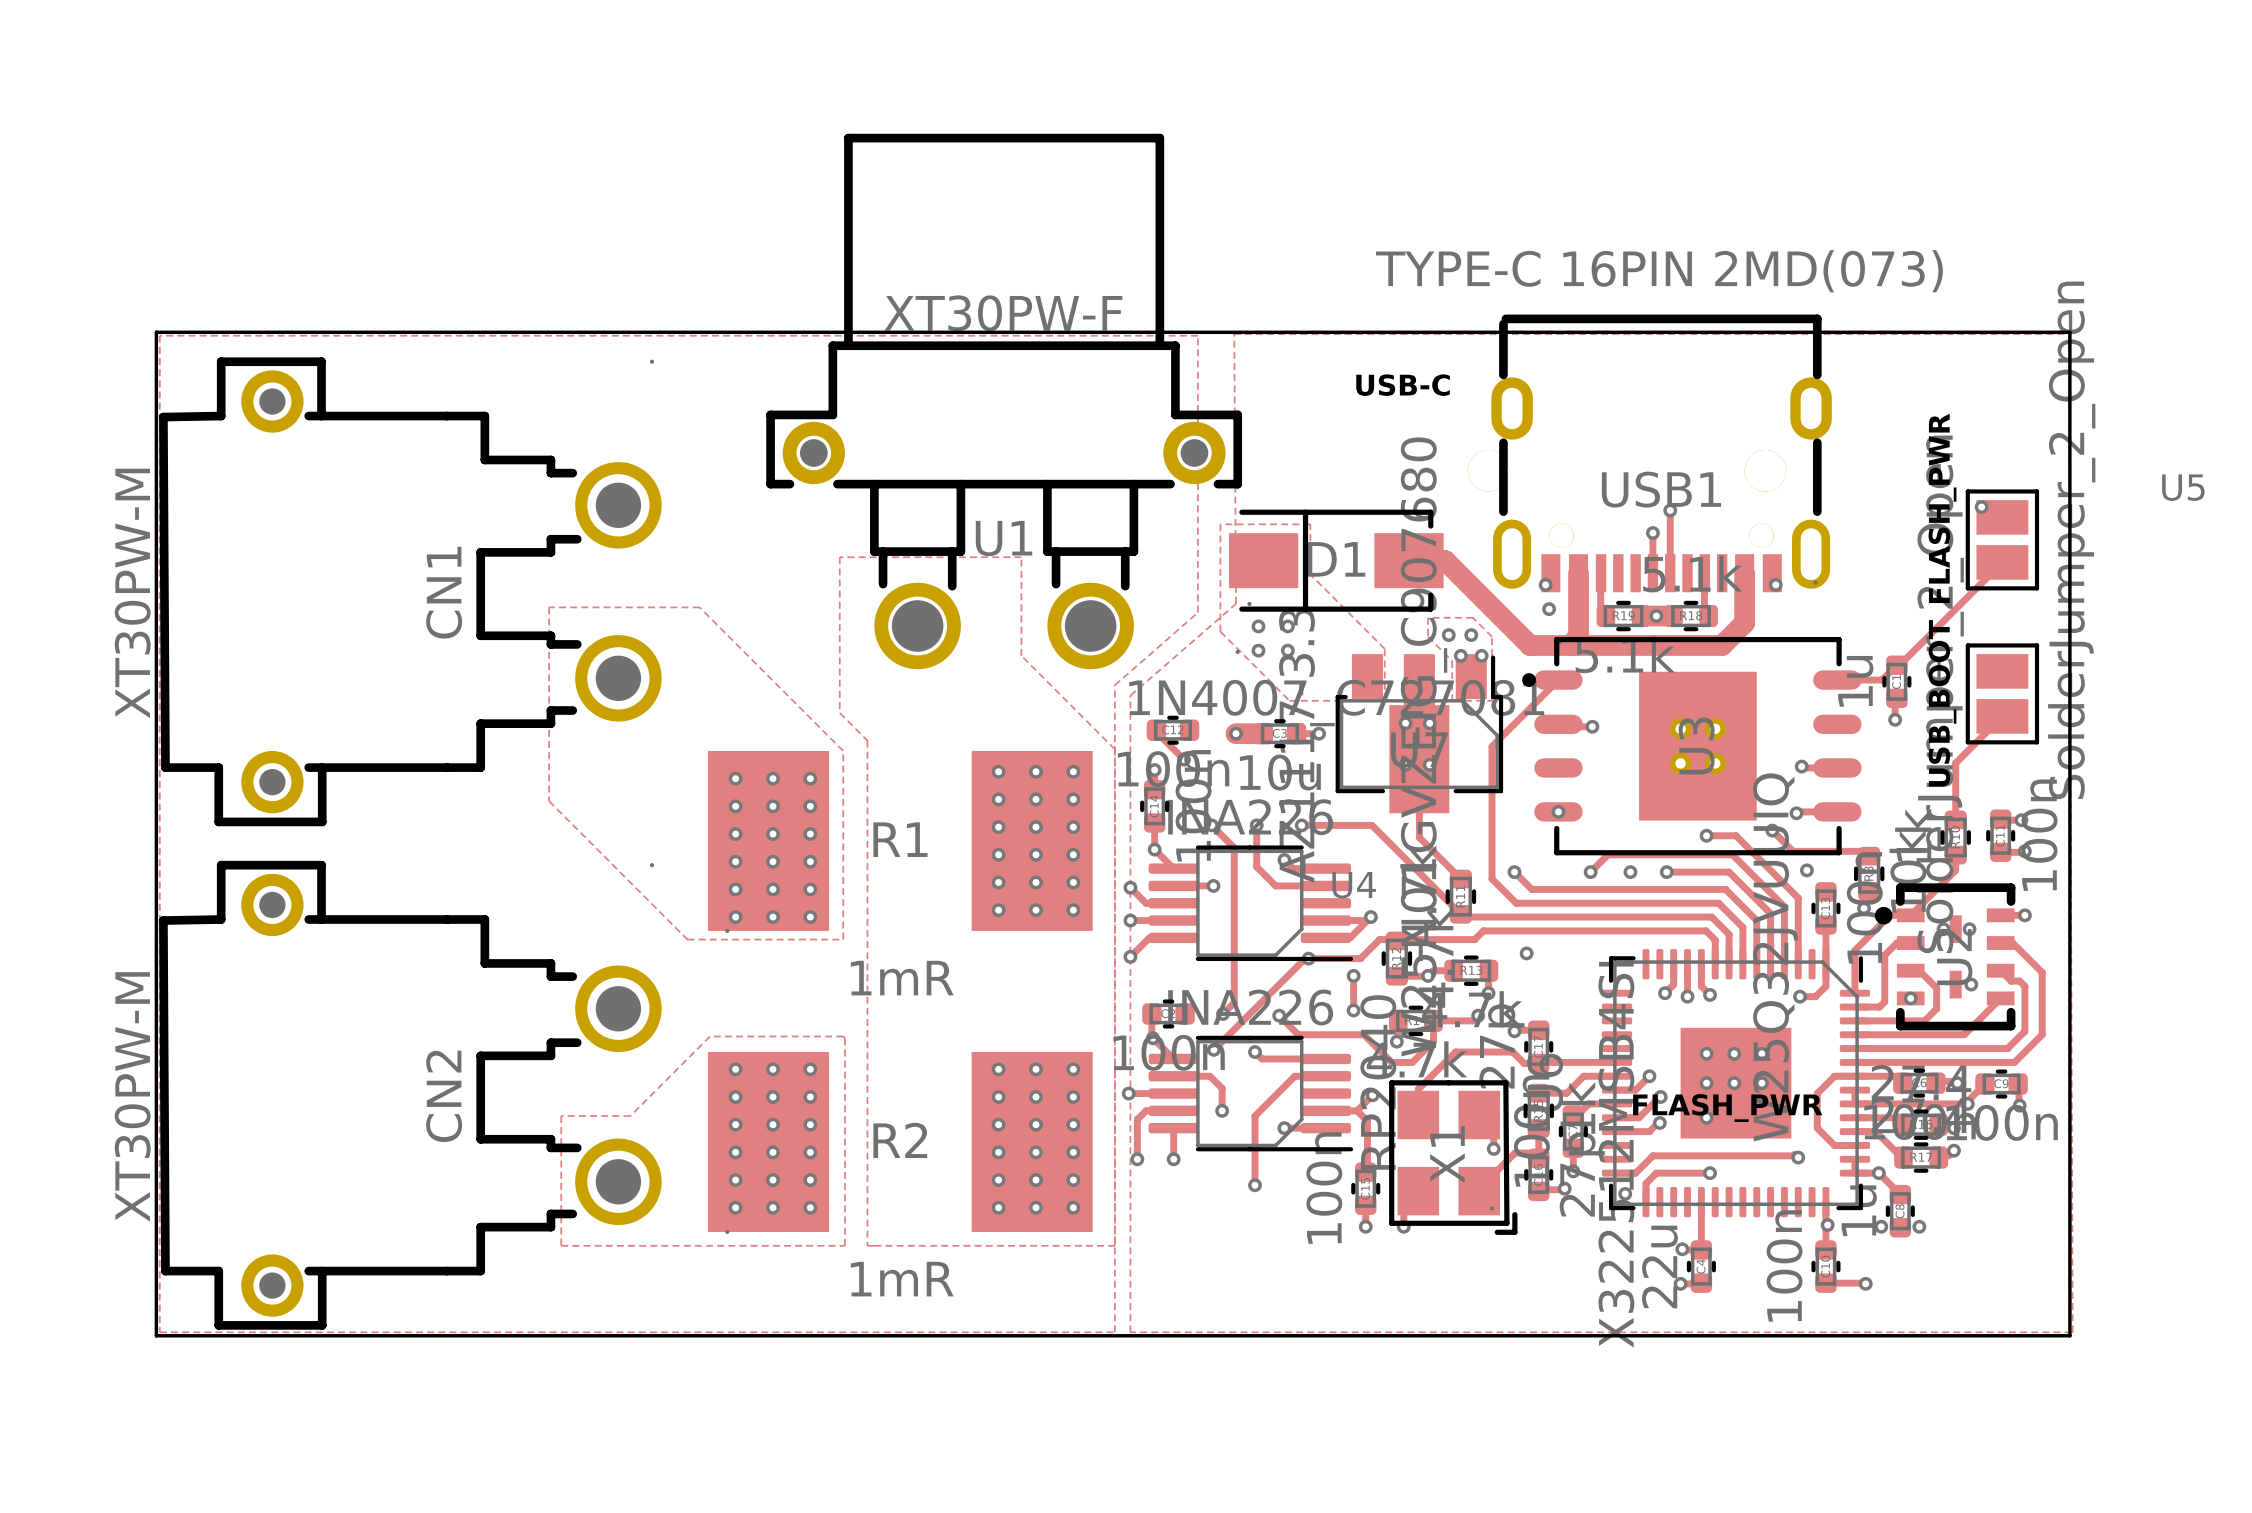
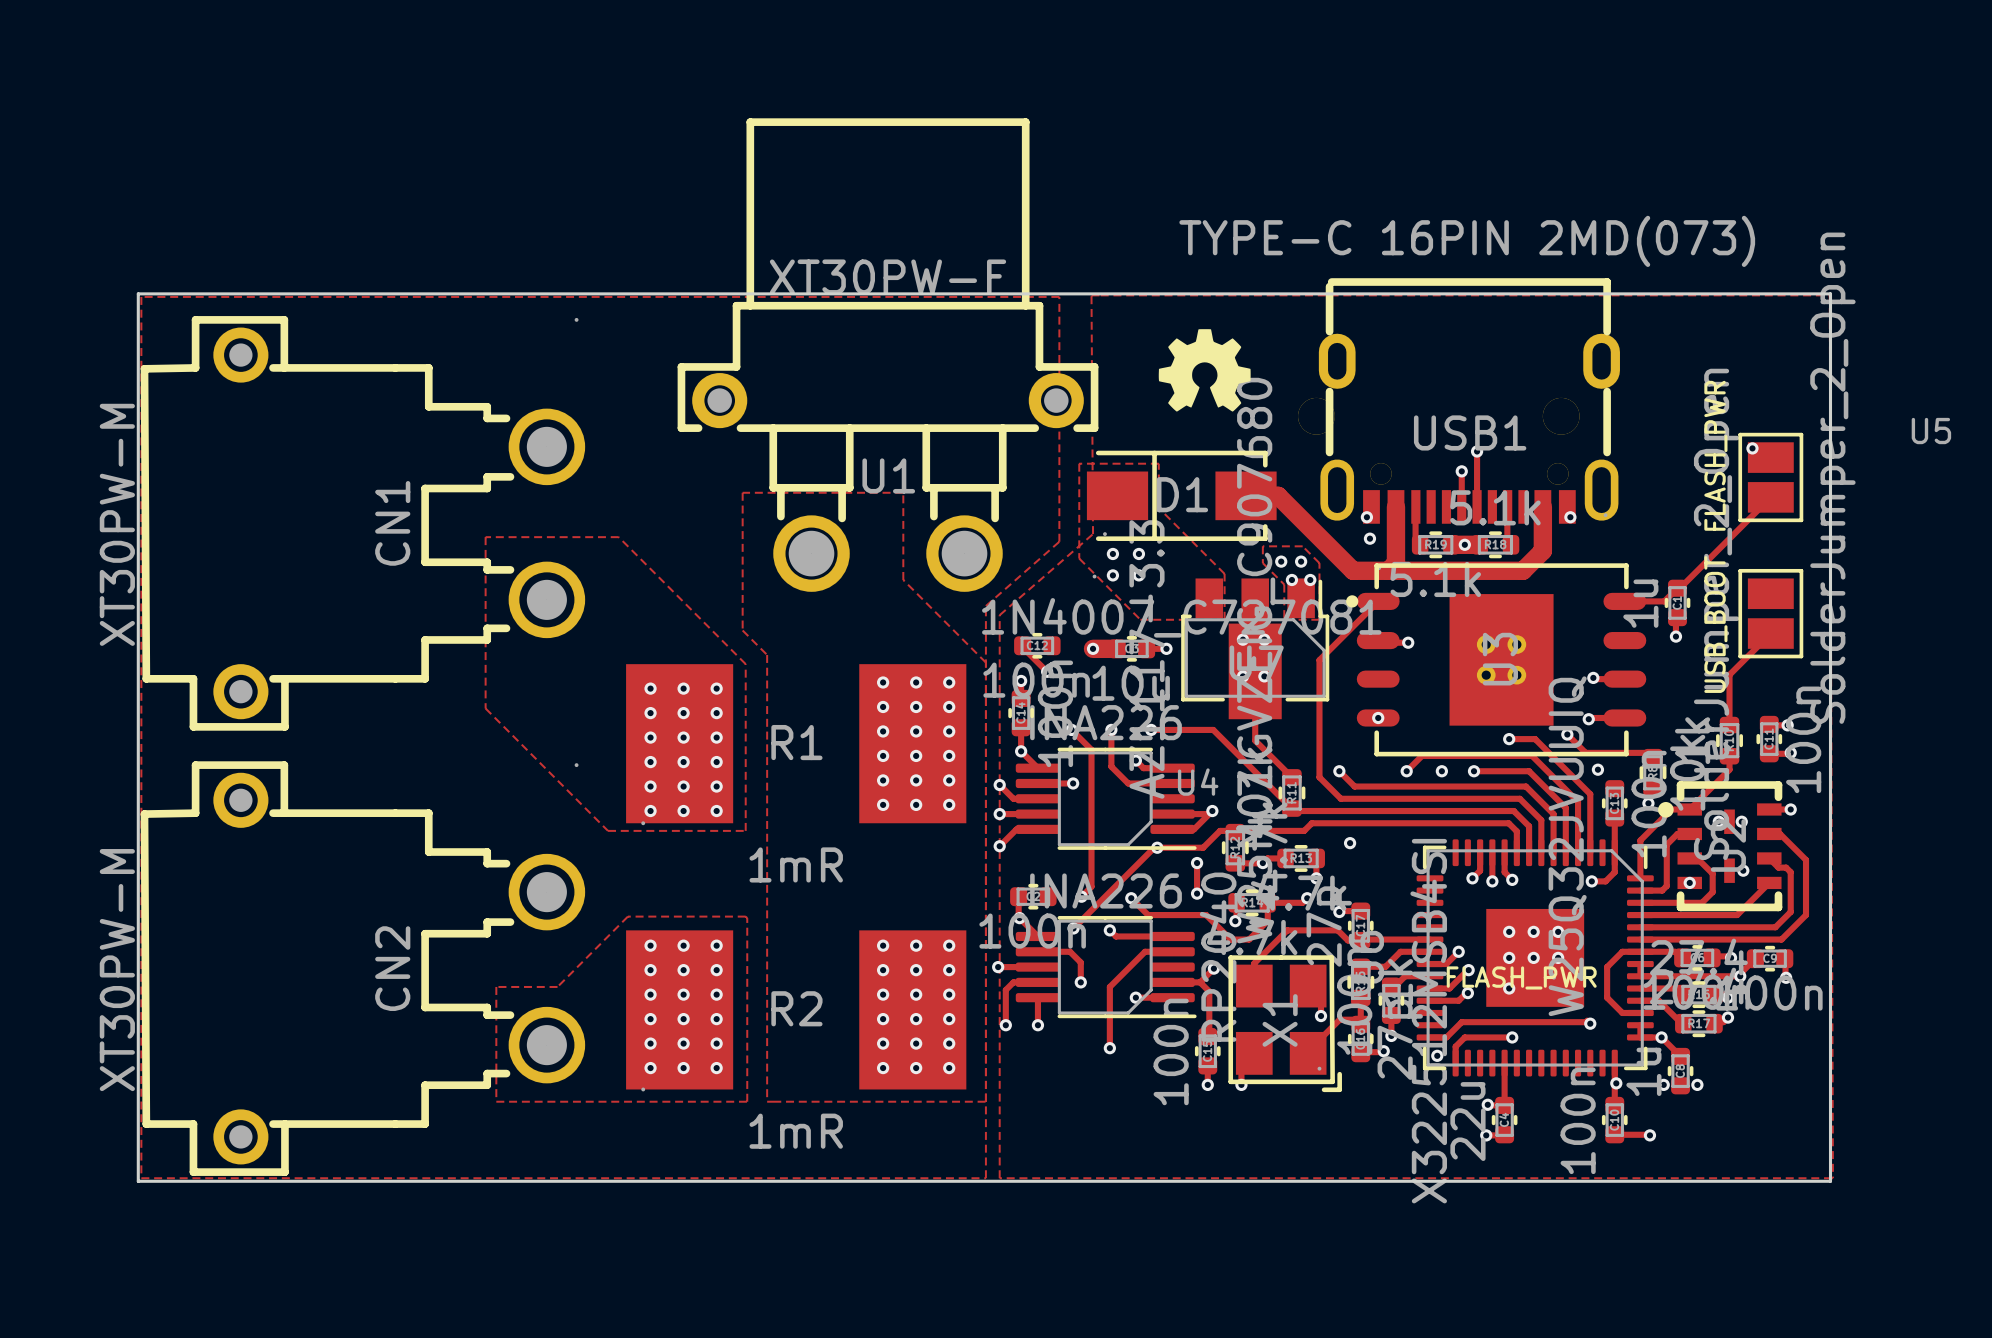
drawing: none -> [1158, 329, 1251, 412]
text: USB-C (1403, 385) -> none

